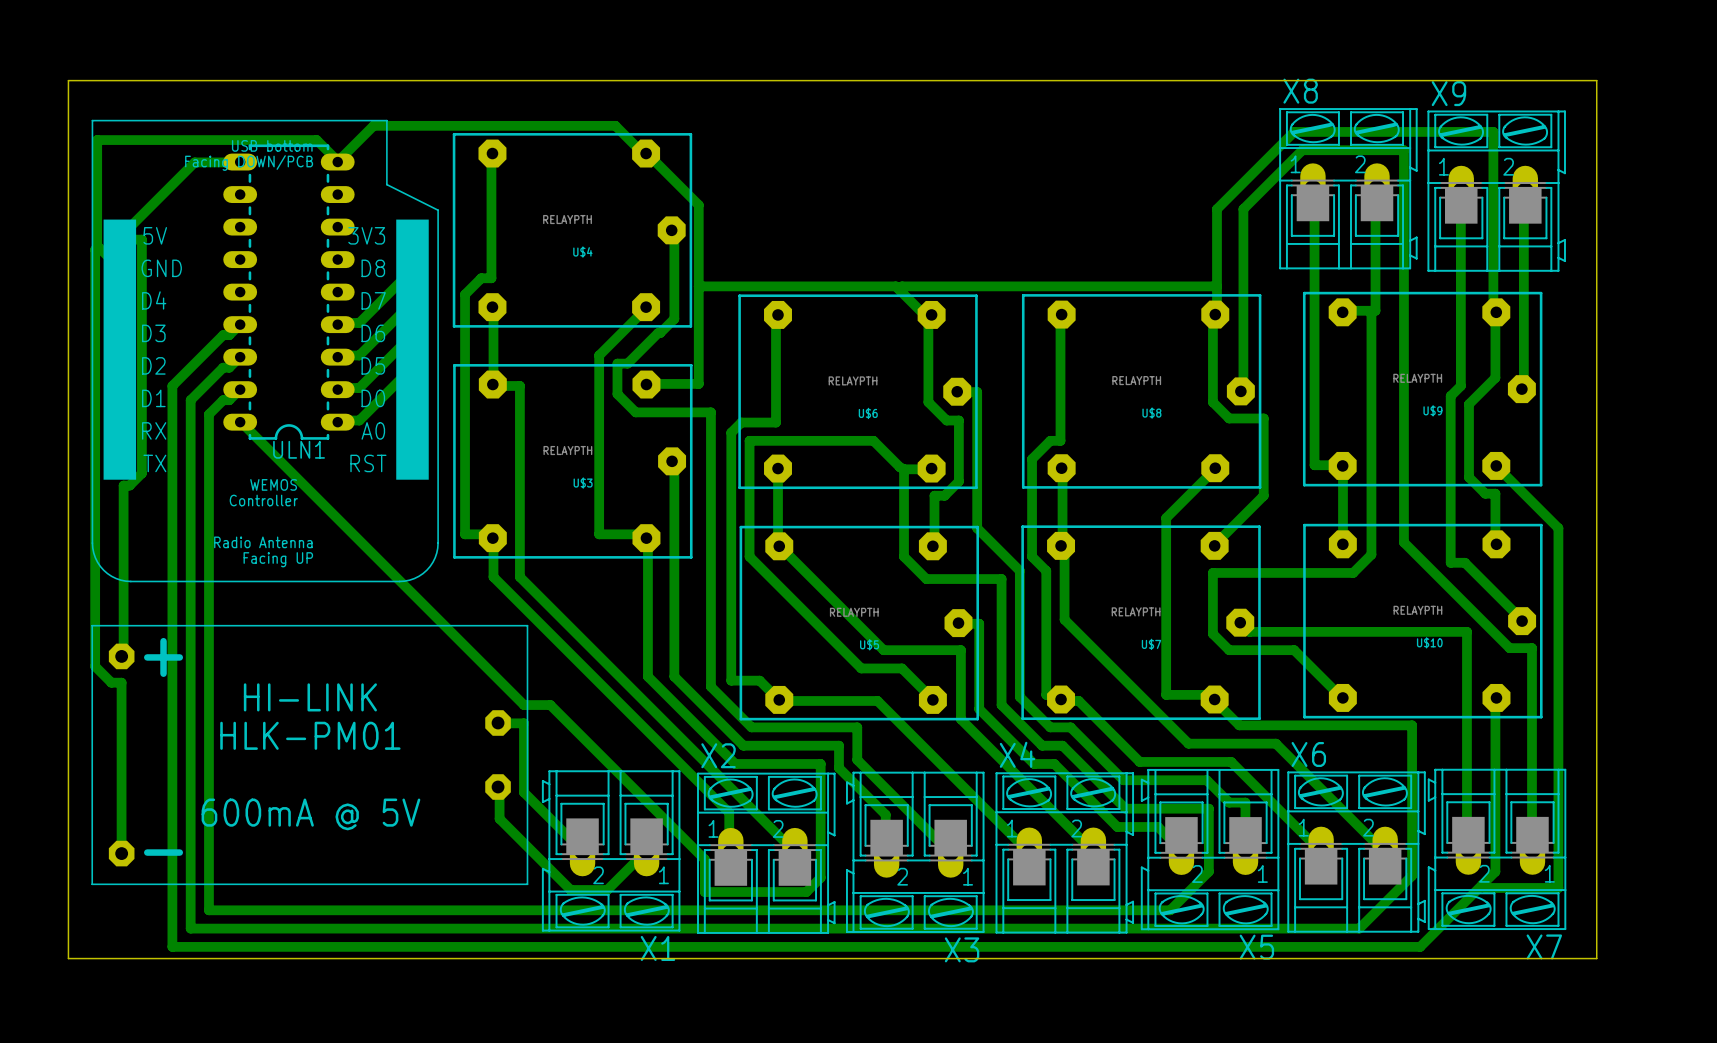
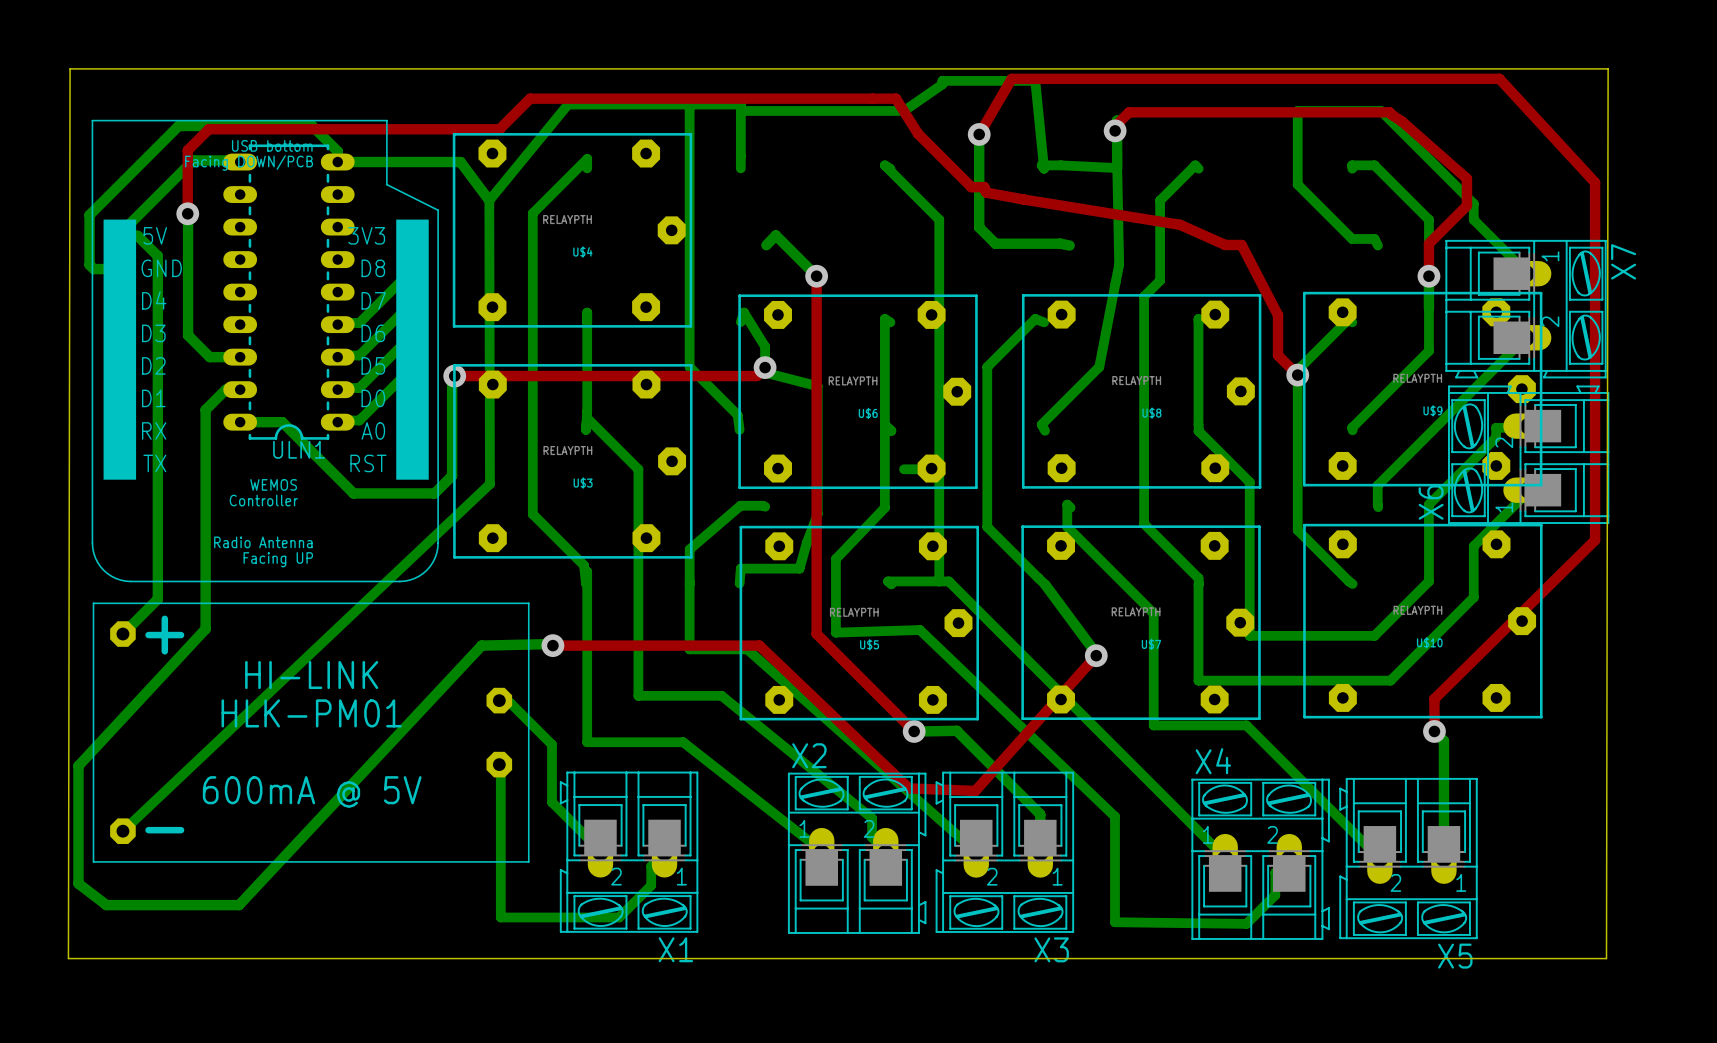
bottom track: none -> (689, 104) (689, 366) (737, 415) (739, 429)
bottom track: none -> (740, 110) (904, 110) (942, 84) (942, 80) (1035, 80) (1044, 168) (1041, 165) (1060, 165) (1117, 168)
bottom track: none -> (1115, 130) (1116, 120) (1117, 168)
top track: none -> (1115, 130) (1115, 126) (1129, 112) (1389, 112) (1466, 178) (1466, 205) (1428, 243) (1428, 276)
via: none -> (1115, 130)
bottom track: none -> (979, 134) (979, 227) (995, 243) (1060, 243) (1069, 245)
top track: none -> (979, 134) (1011, 78) (1499, 78) (1595, 182) (1595, 540) (1434, 698) (1434, 731)
via: none -> (979, 134)
bottom track: (492, 153) (491, 278) (481, 278) (465, 294) (465, 534) (491, 534) (493, 538) (493, 577) (729, 812) (729, 851) (730, 853) -> none
bottom track: (240, 162) (194, 162) (119, 235) (123, 239) (141, 239) (141, 473) (129, 485) (123, 485) (123, 656) (121, 656) -> (240, 162) (238, 160) (193, 160) (119, 233) (119, 235) (137, 235) (157, 256) (157, 599) (122, 634)
bottom track: none -> (587, 168) (587, 158) (532, 213) (532, 514) (584, 565) (585, 583) (587, 571) (587, 742) (683, 742) (820, 850) (821, 853)
bottom track: none -> (740, 168) (740, 104) (568, 104) (489, 200)
bottom track: none -> (890, 168) (884, 165) (939, 219) (939, 581)
bottom track: none -> (1117, 168) (1119, 264) (1099, 366) (1041, 424) (1045, 430)
bottom track: none -> (1198, 168) (1195, 165) (1160, 200) (1160, 280) (1144, 296) (1144, 523) (1198, 578) (1198, 680) (1390, 680) (1473, 597) (1473, 546) (1528, 490)
bottom track: none -> (1352, 168) (1352, 165) (1374, 165) (1428, 219) (1428, 350) (1352, 427) (1352, 430)
bottom track: (1312, 188) (1314, 188) (1314, 465) (1342, 465) (1342, 544) -> none
X8: (1348, 188) -> none
bottom track: (1377, 188) (1375, 310) (1342, 310) (1342, 312) -> none
bottom track: (1461, 191) (1460, 385) (1450, 396) (1450, 562) (1464, 562) (1522, 621) -> none
X9: (1496, 191) -> none
bottom track: (1525, 191) (1523, 388) (1521, 389) -> none
bottom track: none -> (489, 200) (489, 484) (123, 831)
top track: none -> (187, 213) (187, 150) (208, 129) (499, 129) (530, 98) (895, 98) (918, 133) (971, 187) (984, 187) (986, 192) (1023, 199) (1180, 224) (1225, 245) (1241, 245) (1278, 315) (1278, 355) (1297, 375)
via: none -> (187, 213)
bottom track: (671, 230) (674, 231) (674, 318) (627, 363) (617, 363) (617, 394) (635, 412) (710, 412) (710, 686) (751, 727) (857, 727) (857, 759) (950, 852) -> none
bottom track: none -> (766, 245) (775, 235) (816, 276)
bottom track: none -> (1377, 245) (1374, 238) (1352, 238) (1297, 184) (1297, 110) (1380, 110) (1473, 203) (1473, 219) (1526, 273)
bottom track: (98, 246) (95, 249) (95, 666) (111, 682) (121, 682) (121, 853) -> none
bottom track: (119, 268) (97, 245) (97, 140) (316, 140) (337, 162) (373, 125) (615, 125) (641, 152) (647, 154) (698, 205) (698, 383) (646, 384) -> (119, 268) (93, 269) (89, 264) (89, 215) (178, 126) (312, 126) (337, 151) (337, 162) (460, 162) (489, 200)
top track: none -> (816, 276) (816, 633) (914, 731)
via: none -> (816, 276)
via: none -> (1428, 276)
bottom track: (698, 286) (895, 286) (924, 314) (931, 314) (928, 316) (928, 402) (946, 420) (958, 420) (958, 481) (944, 495) (934, 495) (934, 544) (932, 546) -> none
bottom track: (1216, 286) (901, 286) (898, 289) -> none
bottom track: (492, 307) (492, 384) (519, 385) (519, 577) (794, 853) -> none
bottom track: (646, 307) (599, 355) (599, 534) (643, 534) (647, 538) (647, 676) (735, 763) (820, 763) (820, 877) (806, 892) (704, 892) (704, 859) (550, 705) (523, 705) (240, 422) -> (454, 376) (452, 378) (452, 475) (434, 493) (353, 493) (282, 422) (240, 422)
bottom track: (1371, 310) (1371, 554) (1353, 572) (1212, 572) (1212, 633) (1229, 650) (1294, 650) (1342, 697) -> none
bottom track: (778, 314) (775, 316) (775, 422) (741, 422) (731, 432) (731, 680) (759, 680) (780, 700) (877, 700) (1029, 852) -> none
bottom track: (1061, 314) (1060, 440) (1050, 440) (1032, 459) (1032, 556) (1046, 570) (1046, 694) (1060, 694) (1062, 700) (1078, 700) (1139, 761) (1231, 761) (1321, 852) -> none
bottom track: none -> (587, 322) (587, 312) (585, 429) (587, 418) (638, 469) (638, 695) (721, 695) (872, 818) (872, 837) (885, 853)
bottom track: none -> (740, 322) (744, 312) (765, 346) (765, 372) (817, 386) (817, 514) (799, 568) (740, 568) (739, 583)
bottom track: none -> (890, 322) (884, 318) (884, 424) (891, 430) (884, 427) (884, 507) (835, 559) (835, 632) (919, 630) (1115, 816) (1115, 922) (1246, 923) (1275, 895) (1275, 872) (1289, 859)
bottom track: none -> (1044, 322) (1035, 318) (987, 366) (987, 527) (1045, 584) (1096, 655)
bottom track: none -> (1198, 322) (1198, 318) (1198, 431) (1249, 482) (1249, 635) (1374, 635) (1428, 581) (1428, 504) (1496, 437) (1496, 427) (1528, 427) (1528, 426)
bottom track: none -> (1352, 322) (1348, 318) (1297, 370) (1297, 530) (1352, 583)
bottom track: (240, 324) (229, 335) (223, 335) (172, 385) (172, 946) (1420, 946) (1495, 871) (1496, 697) -> none
bottom track: none -> (1526, 337) (1377, 485) (1378, 507)
bottom track: (240, 357) (229, 367) (223, 367) (190, 400) (190, 928) (1359, 928) (1412, 875) (1412, 725) (1239, 725) (1214, 700) (1212, 694) (1166, 694) (1166, 518) (1215, 468) -> (240, 357) (209, 357) (188, 335) (187, 213)
top track: none -> (765, 367) (756, 376) (454, 376)
via: none -> (765, 367)
via: none -> (1297, 375)
via: none -> (454, 376)
bottom track: (240, 389) (229, 400) (223, 400) (208, 414) (208, 910) (1170, 910) (1208, 871) (1208, 808) (1125, 808) (1062, 745) (1042, 745) (1001, 705) (1001, 579) (926, 579) (904, 556) (904, 469) (873, 440) (749, 440) (749, 556) (861, 668) (901, 668) (932, 699) -> (240, 389) (225, 389) (205, 409) (205, 629) (78, 765) (78, 883) (106, 905) (239, 905) (481, 645) (554, 643) (552, 645)
bottom track: (957, 391) (977, 392) (977, 528) (1019, 570) (1019, 696) (1050, 727) (1070, 727) (1123, 780) (1206, 780) (1229, 802) (1245, 802) (1245, 849) -> none
bottom track: (1240, 391) (1243, 390) (1243, 209) (1302, 150) (1403, 150) (1403, 542) (1509, 648) (1532, 648) (1532, 849) -> none
bottom track: (672, 461) (674, 463) (674, 676) (743, 745) (838, 745) (838, 768) (885, 814) (886, 852) -> none
bottom track: (1496, 465) (1558, 528) (1558, 887) (1485, 887) (1482, 884) -> none
bottom track: (778, 468) (779, 546) (883, 650) (960, 650) (960, 719) (1093, 852) -> none
bottom track: (1061, 468) (1061, 545) (1064, 546) (1064, 619) (1188, 743) (1275, 743) (1385, 852) -> none
bottom track: none -> (765, 506) (740, 505) (689, 549) (689, 649) (747, 649) (976, 852)
bottom track: none -> (1070, 507) (1067, 504) (1067, 527) (1153, 613) (1153, 725) (1246, 725) (1379, 858)
bottom track: (1496, 544) (1495, 493) (1485, 493) (1469, 477) (1469, 404) (1495, 377) (1493, 131) (1294, 131) (1216, 209) (1216, 310) (1212, 314) (1212, 402) (1229, 418) (1263, 418) (1263, 495) (1214, 545) -> none
bottom track: none -> (891, 584) (888, 581) (948, 581) (1225, 859)
bottom track: (1240, 622) (1249, 631) (1466, 631) (1468, 849) -> none
bottom track: (958, 623) (979, 623) (979, 709) (1034, 763) (1054, 763) (1117, 826) (1158, 826) (1181, 849) -> none
top track: none -> (552, 645) (759, 645) (908, 788) (975, 790) (1096, 655)
via: none -> (552, 645)
via: none -> (1096, 655)
bottom track: none -> (499, 700) (500, 703) (510, 703) (552, 744) (552, 802) (600, 852)
bottom track: (498, 722) (523, 723) (523, 792) (582, 850) -> none
bottom track: none -> (914, 731) (956, 730) (1039, 813) (1040, 852)
via: none -> (914, 731)
bottom track: none -> (1434, 731) (1443, 740) (1443, 858)
via: none -> (1434, 731)
part position: (309, 755) -> (311, 732)
bottom track: none -> (499, 764) (500, 917) (619, 917) (651, 885) (651, 866) (664, 852)
bottom track: (498, 787) (499, 818) (570, 889) (607, 889) (646, 850) -> none
X5 position: (1210, 849) -> (1408, 858)
X7 rotation: 0° (1497, 849) -> 90° counterclockwise (1526, 309)
X7 position: (1497, 849) -> (1526, 309)
X1 position: (611, 850) -> (629, 852)
X3 position: (915, 852) -> (1004, 852)
X4 position: (1064, 852) -> (1260, 859)
X6 rotation: 0° (1356, 852) -> 90° counterclockwise (1528, 454)
X6 position: (1356, 852) -> (1528, 454)
X2 position: (766, 853) -> (857, 853)
board edge: (68, 958) (68, 80) (1596, 80) (1596, 958) -> (68, 958) (70, 68) (1608, 68) (1606, 958) (1596, 958)

